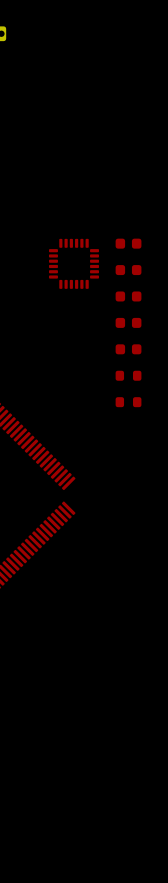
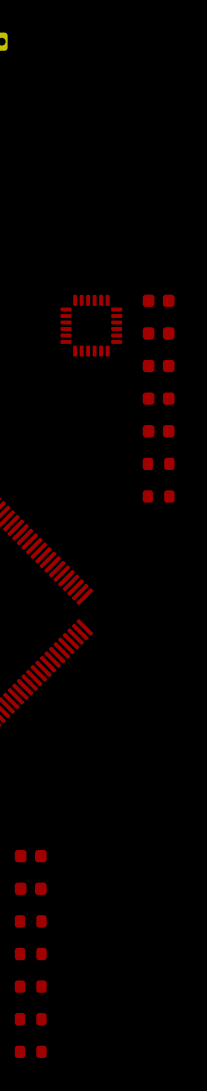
part: none -> (30, 856)
part: none -> (30, 888)
part: none -> (30, 921)
part: none -> (30, 953)
part: none -> (30, 986)
part: none -> (30, 1019)
part: none -> (30, 1051)

